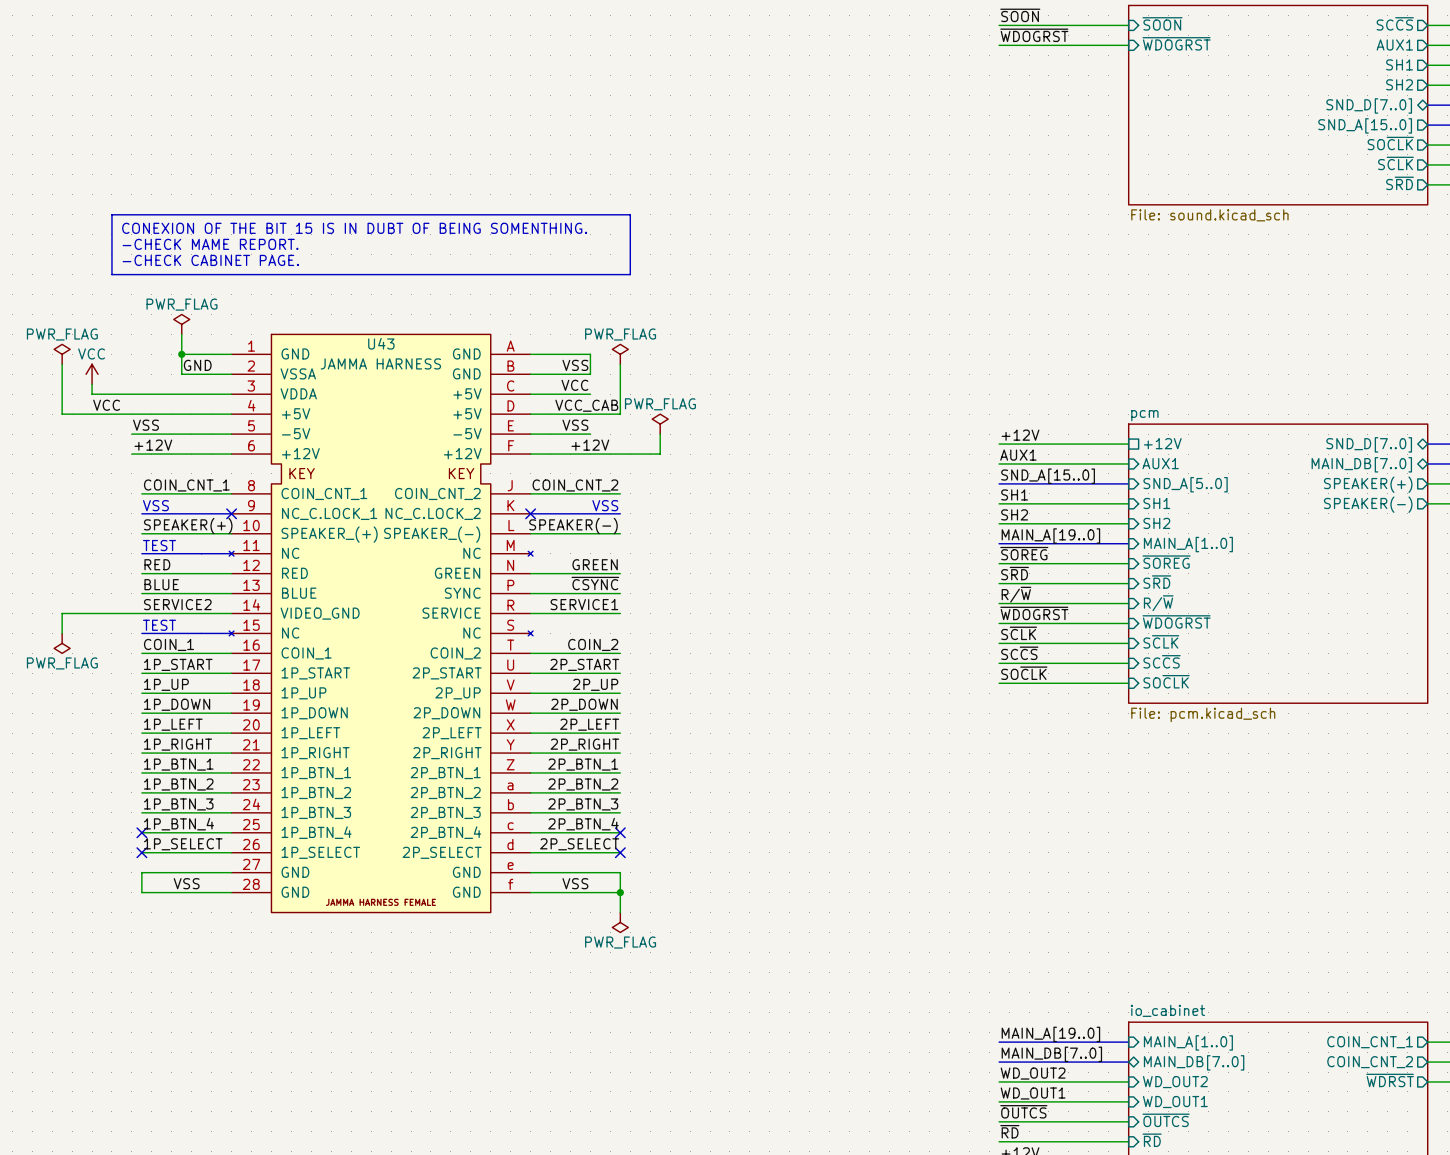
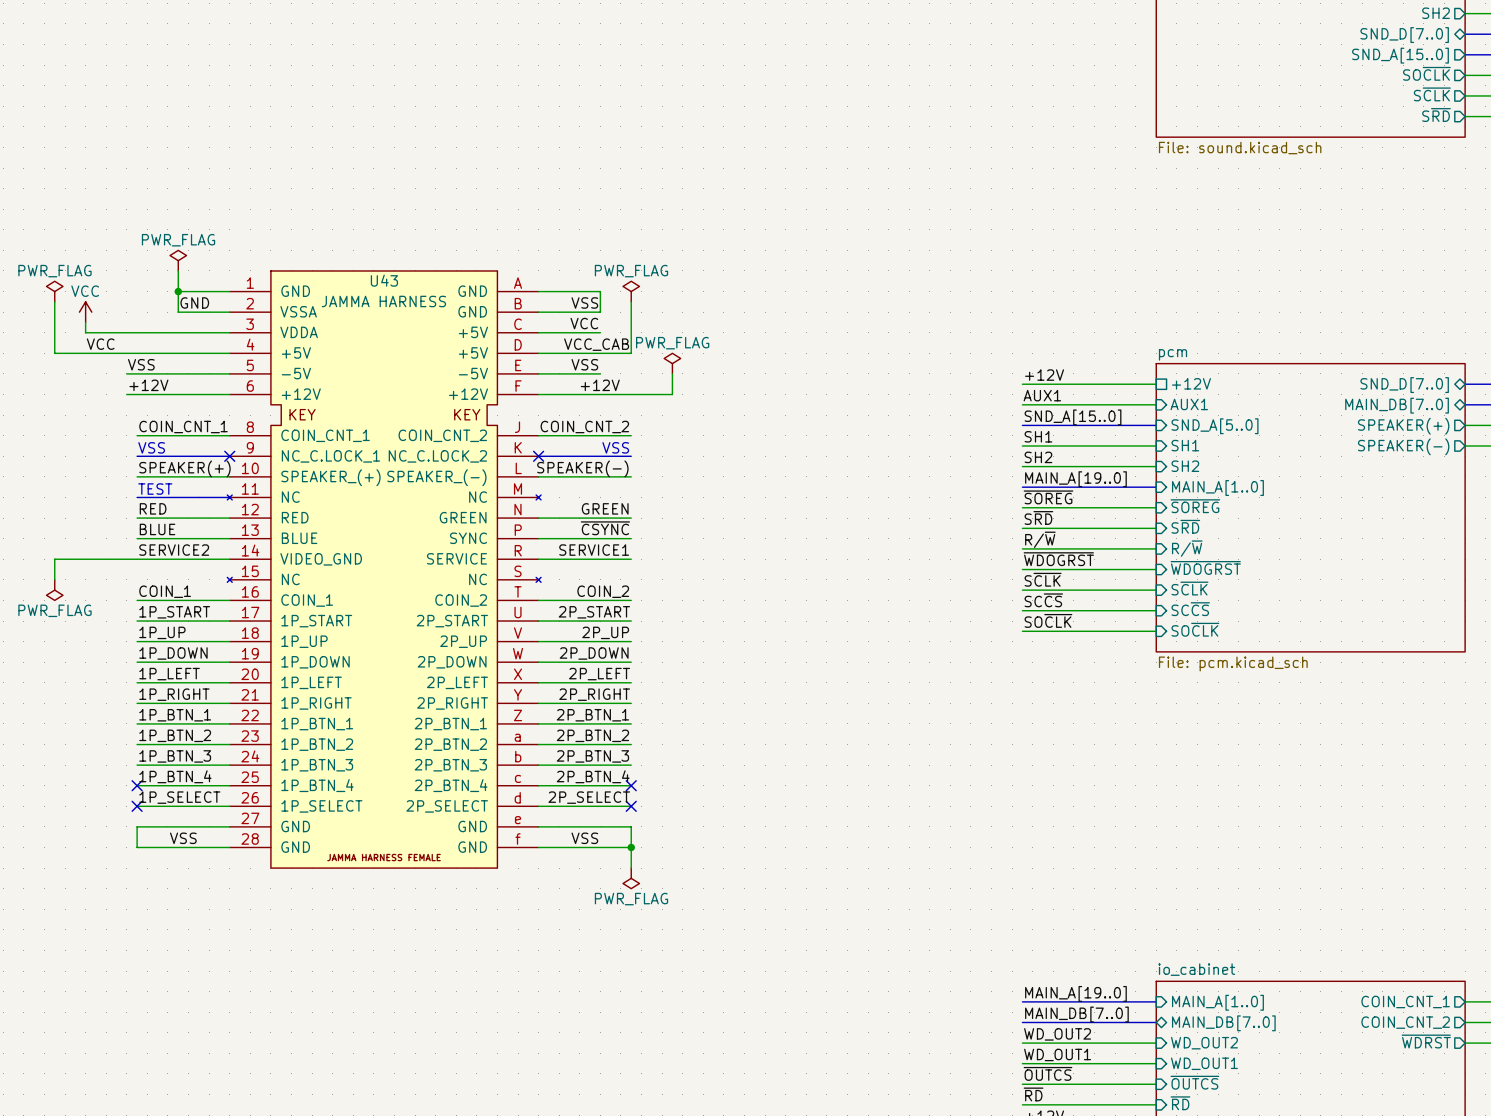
line: (111, 214) (630, 214) (630, 274) (111, 274) (111, 214) -> none
text: CONEXION OF THE BIT 15 IS IN DUBT OF BEING SOMENTHING. (354, 228) -> none
text: -CHECK MAME REPORT. (210, 244) -> none
text: -CHECK CABINET PAGE. (210, 260) -> none
text: TEST (159, 625) -> none
line: (141, 633) (231, 633) -> none

